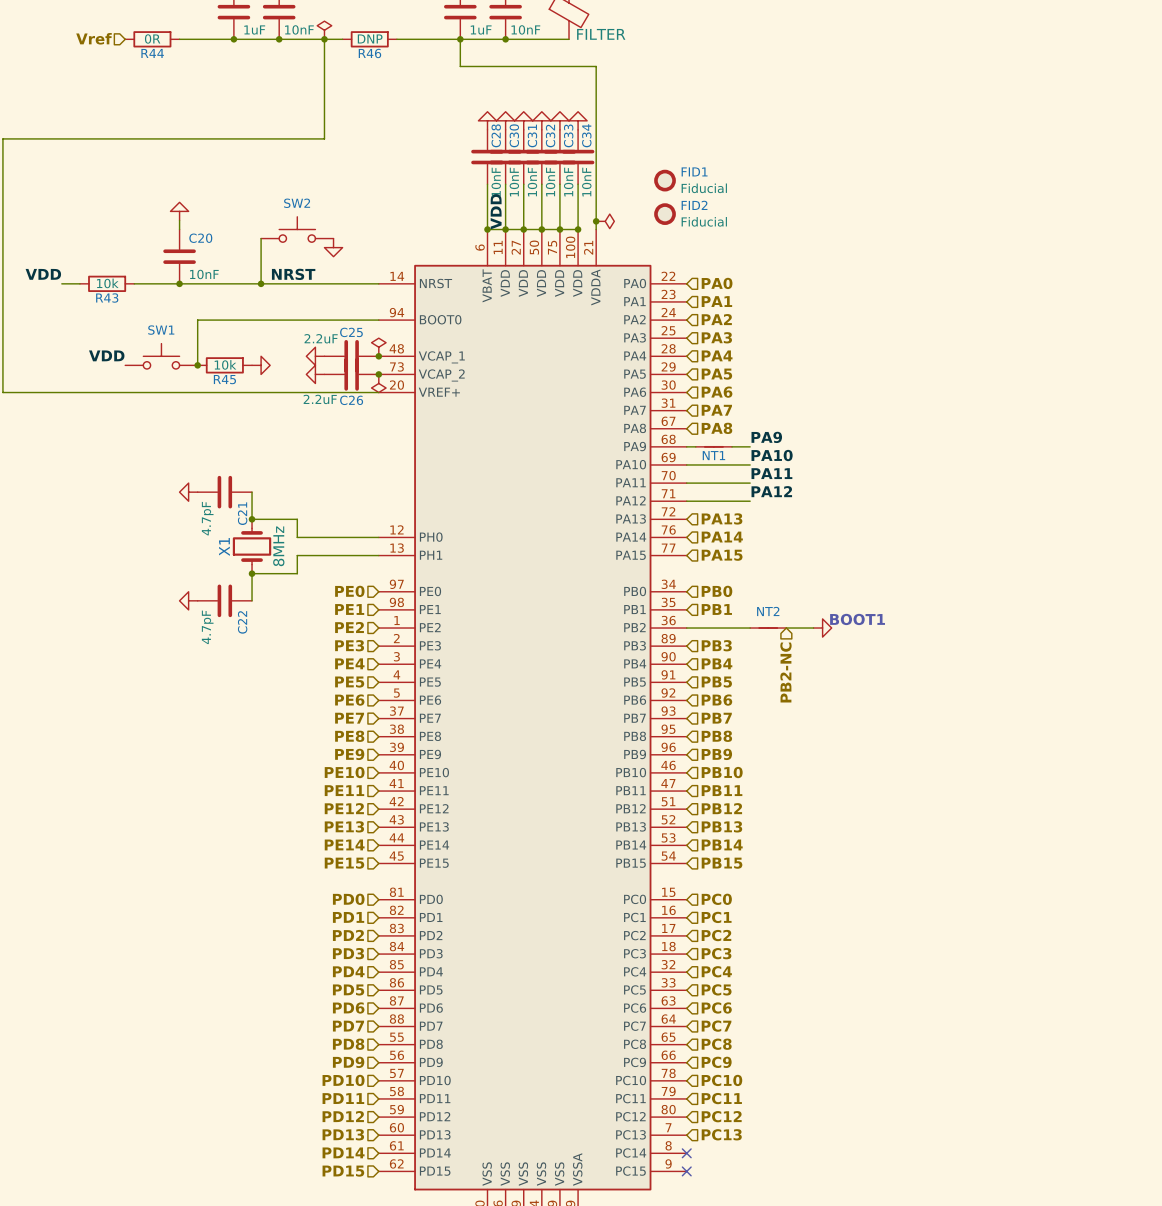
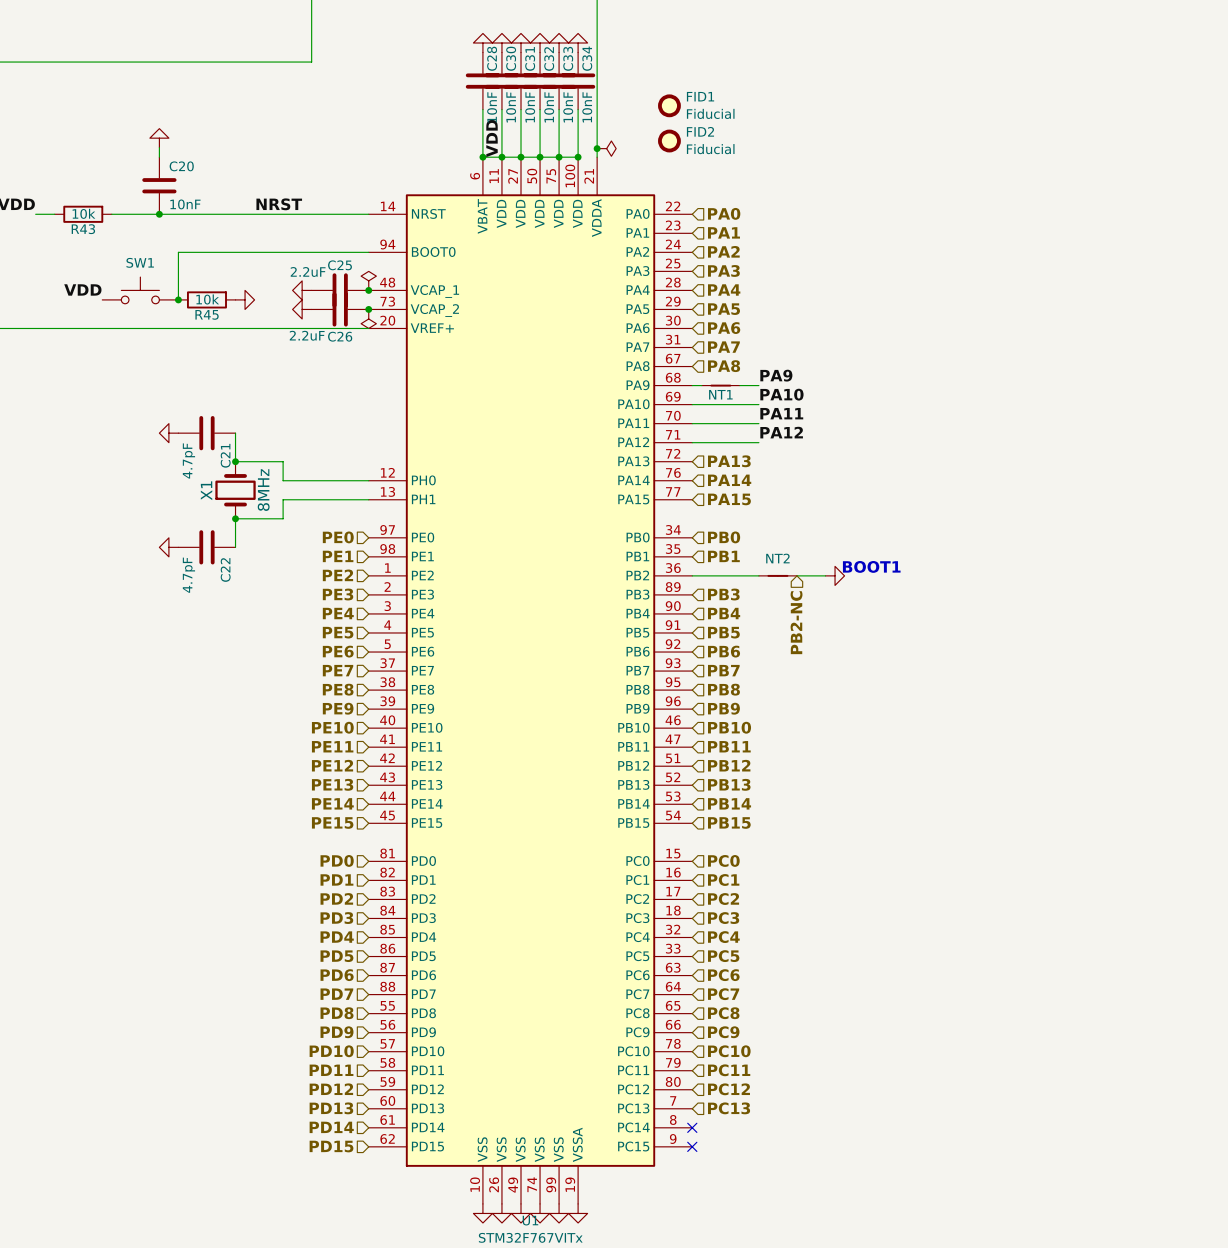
SW2: (297, 229) -> none
wire: (261, 238) (261, 283) -> none
power symbol: (333, 247) -> none
junction: (261, 283) -> none

